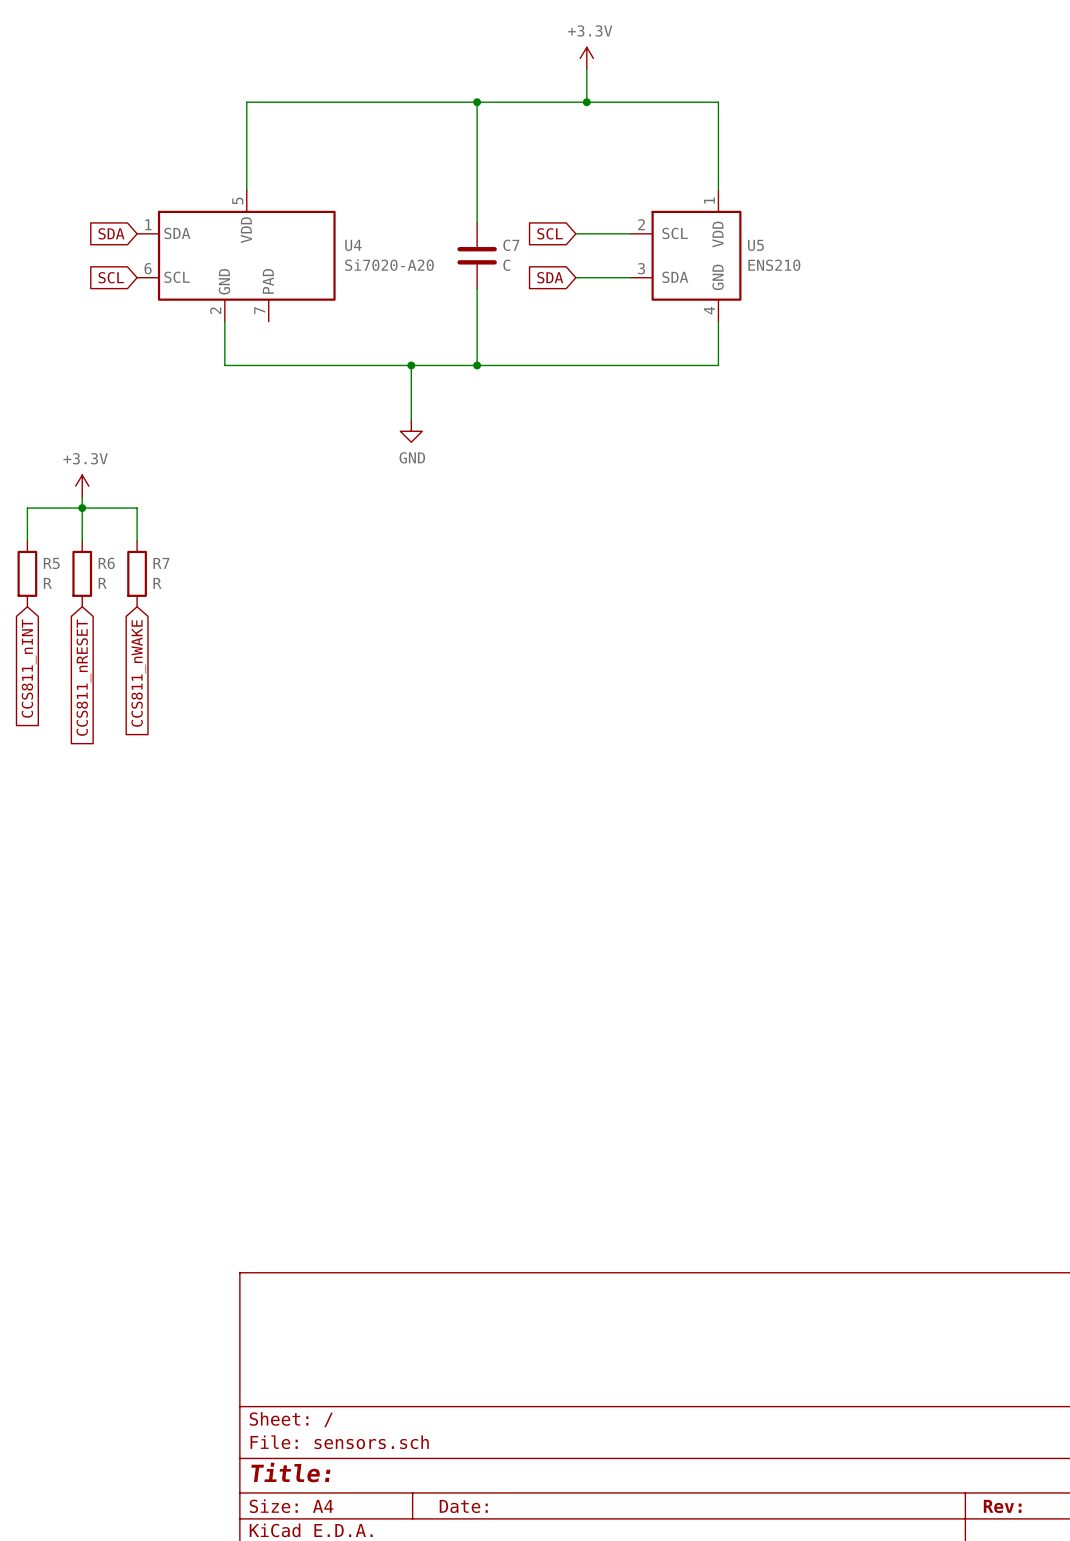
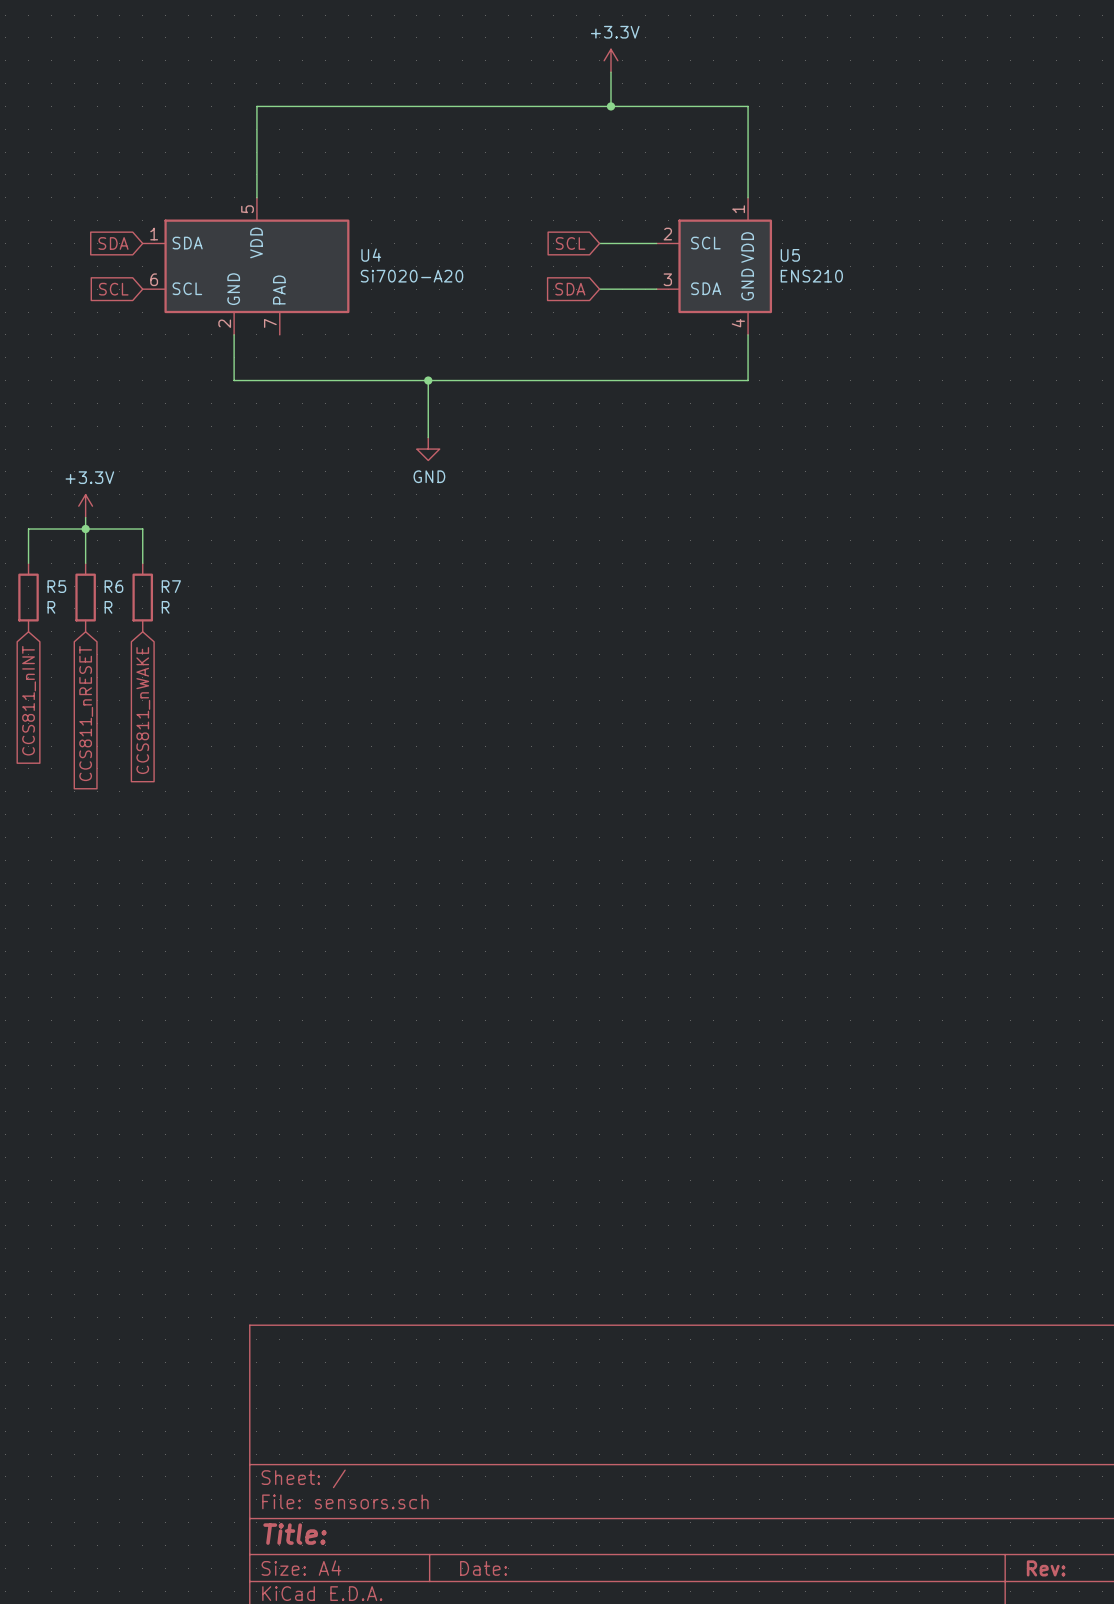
wire: (477, 102) (477, 222) -> none
junction: (477, 102) -> none
C7: C (477, 255) -> none
wire: (477, 288) (477, 365) -> none
junction: (477, 365) -> none

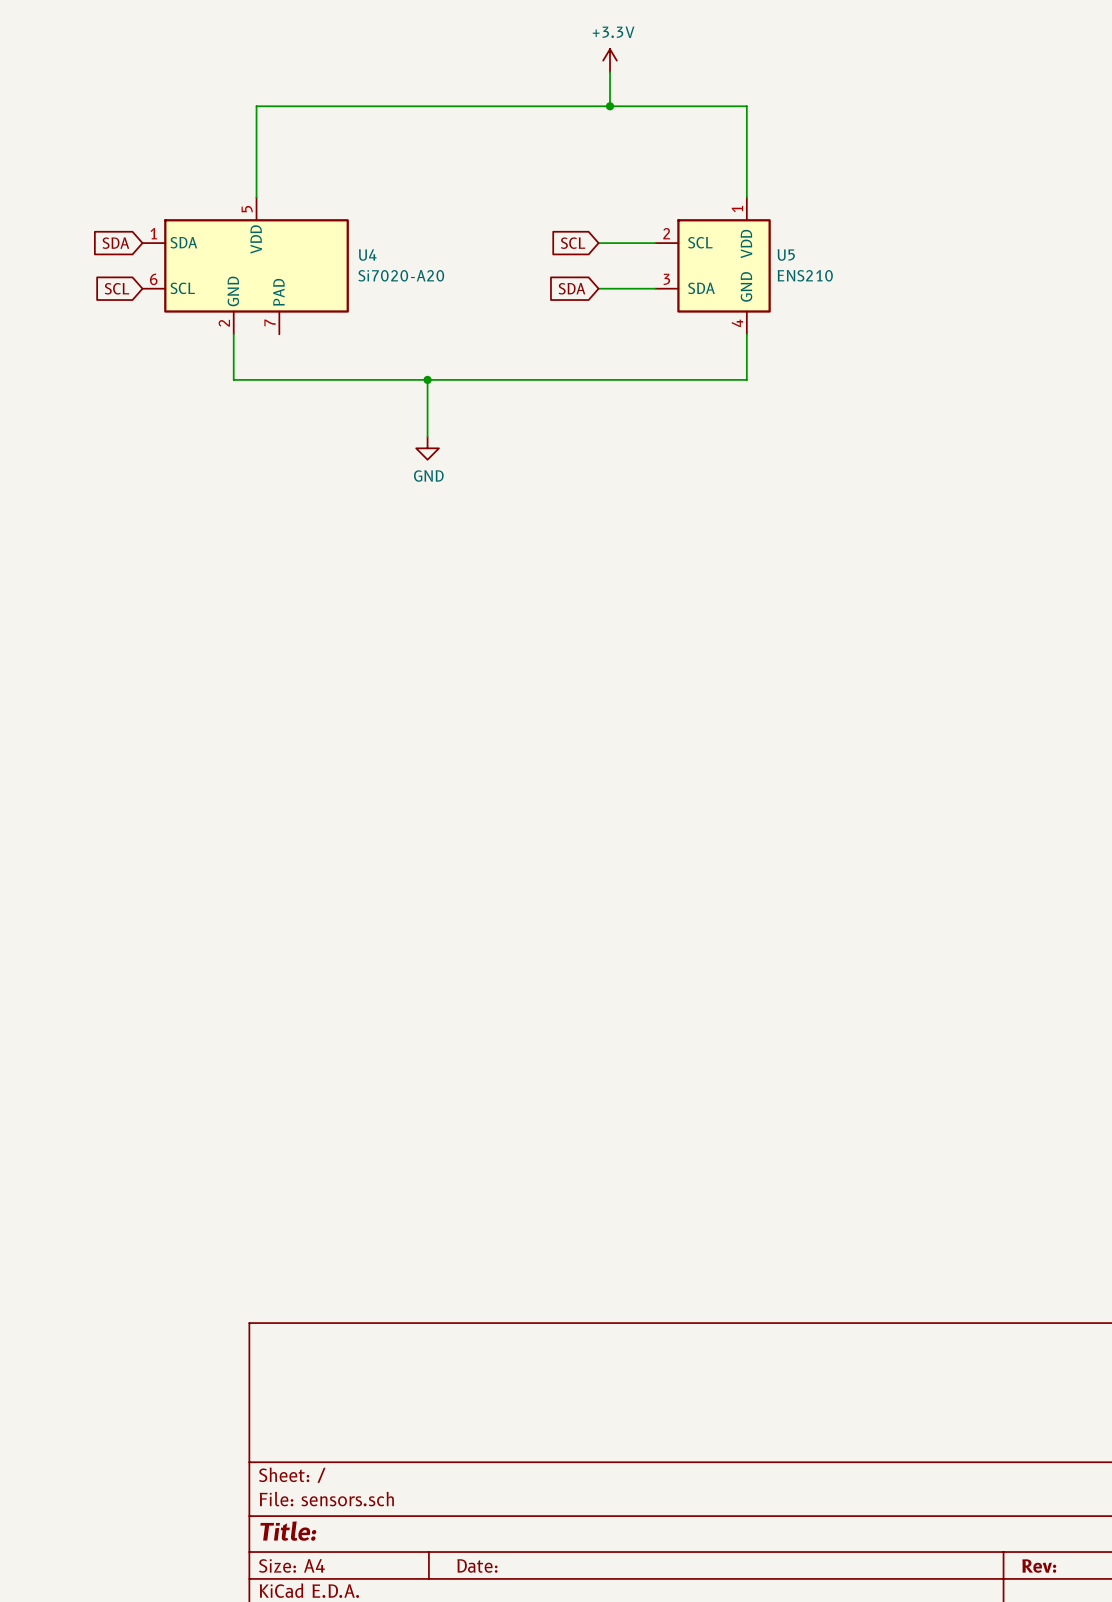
power symbol: +3.3V (85, 506) -> none
wire: (85, 517) (85, 563) -> none
junction: (85, 529) -> none
wire: (28, 563) (28, 529) (142, 529) (142, 563) -> none
R5: R (28, 597) -> none
R6: R (85, 597) -> none
R7: R (142, 597) -> none
global label: CCS811_nINT (29, 700) -> none
global label: CCS811_nWAKE (143, 710) -> none
global label: CCS811_nRESET (86, 713) -> none

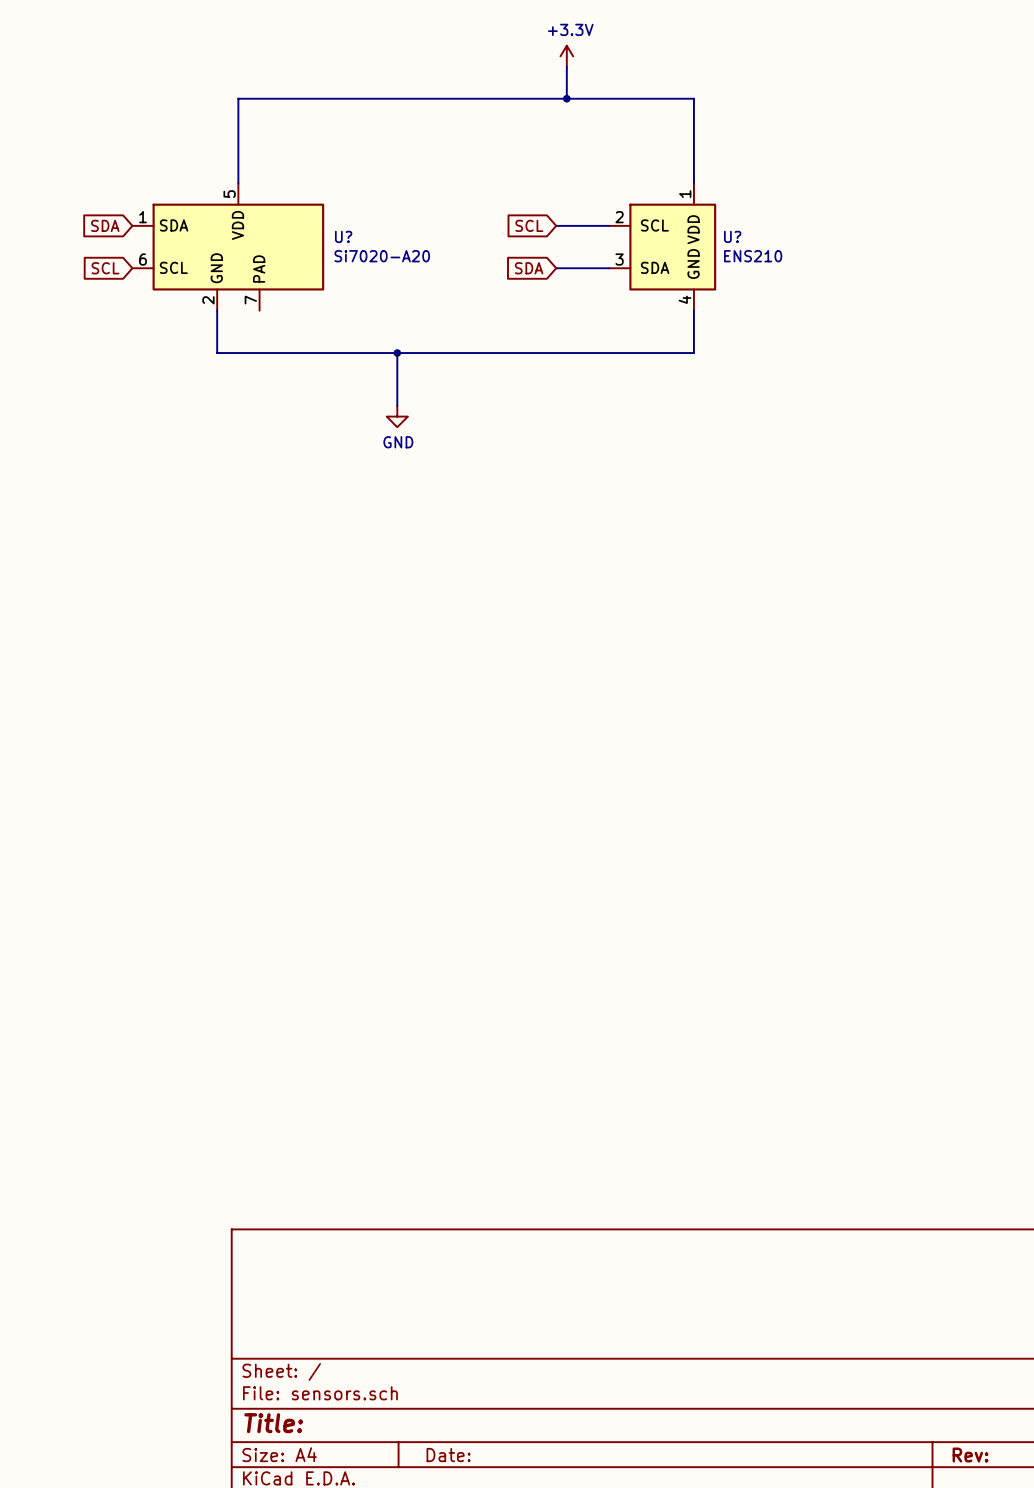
U4 name: U4 (367, 255) -> U? (343, 236)
U5 name: U5 (786, 255) -> U? (732, 236)

